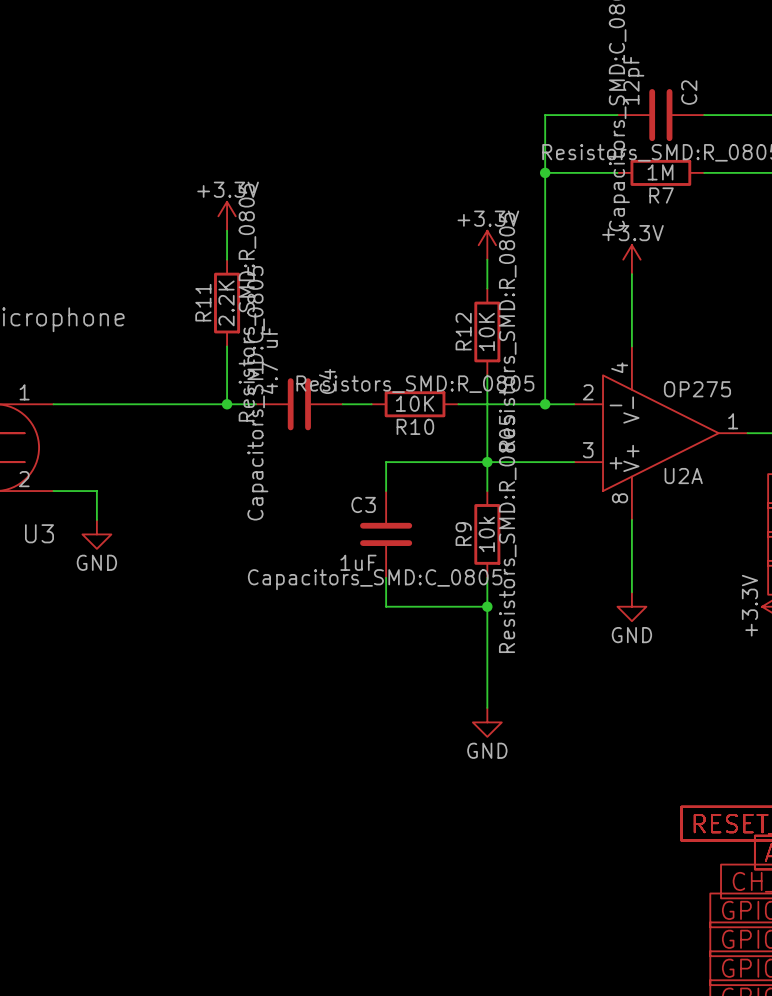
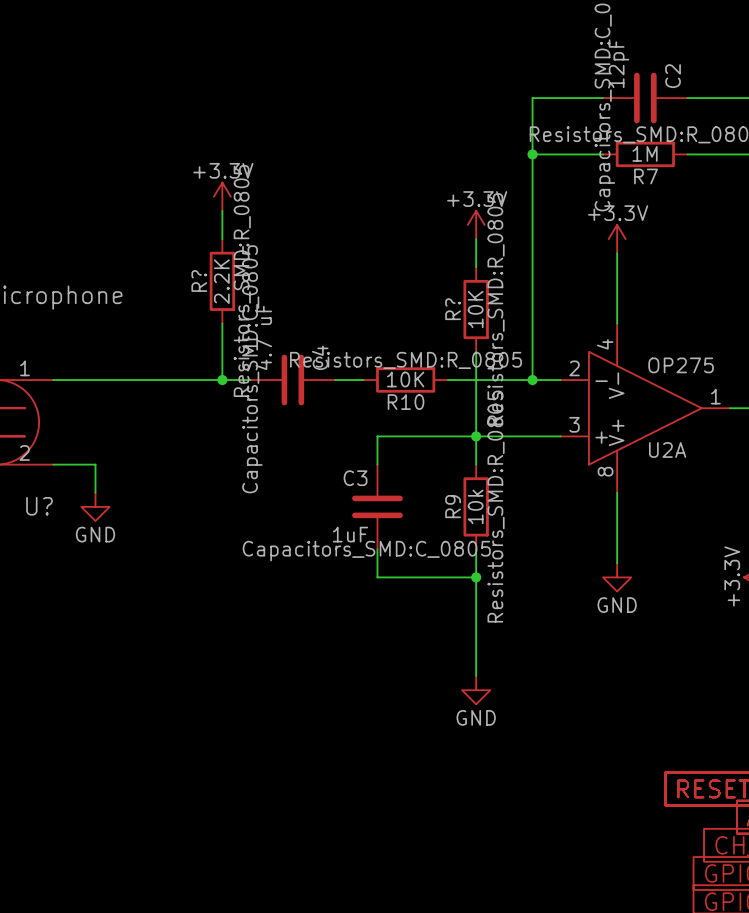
R11 name: R11 (203, 302) -> R? (199, 281)
R12 name: R12 (463, 331) -> R? (453, 309)
U3 name: U3 (39, 533) -> U? (39, 506)

